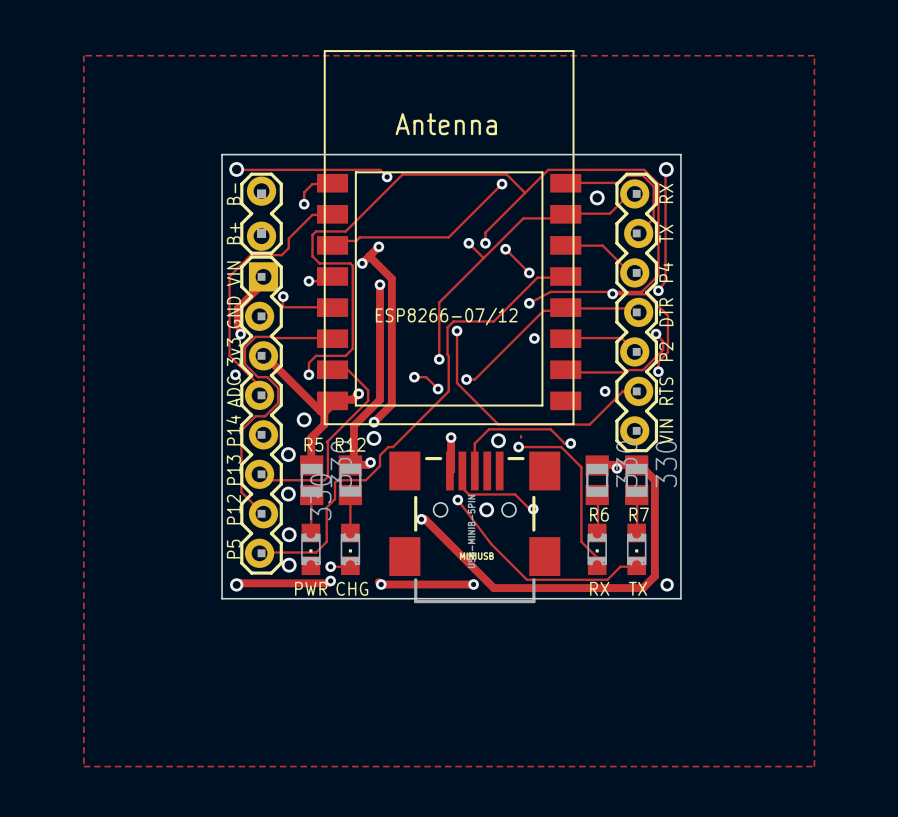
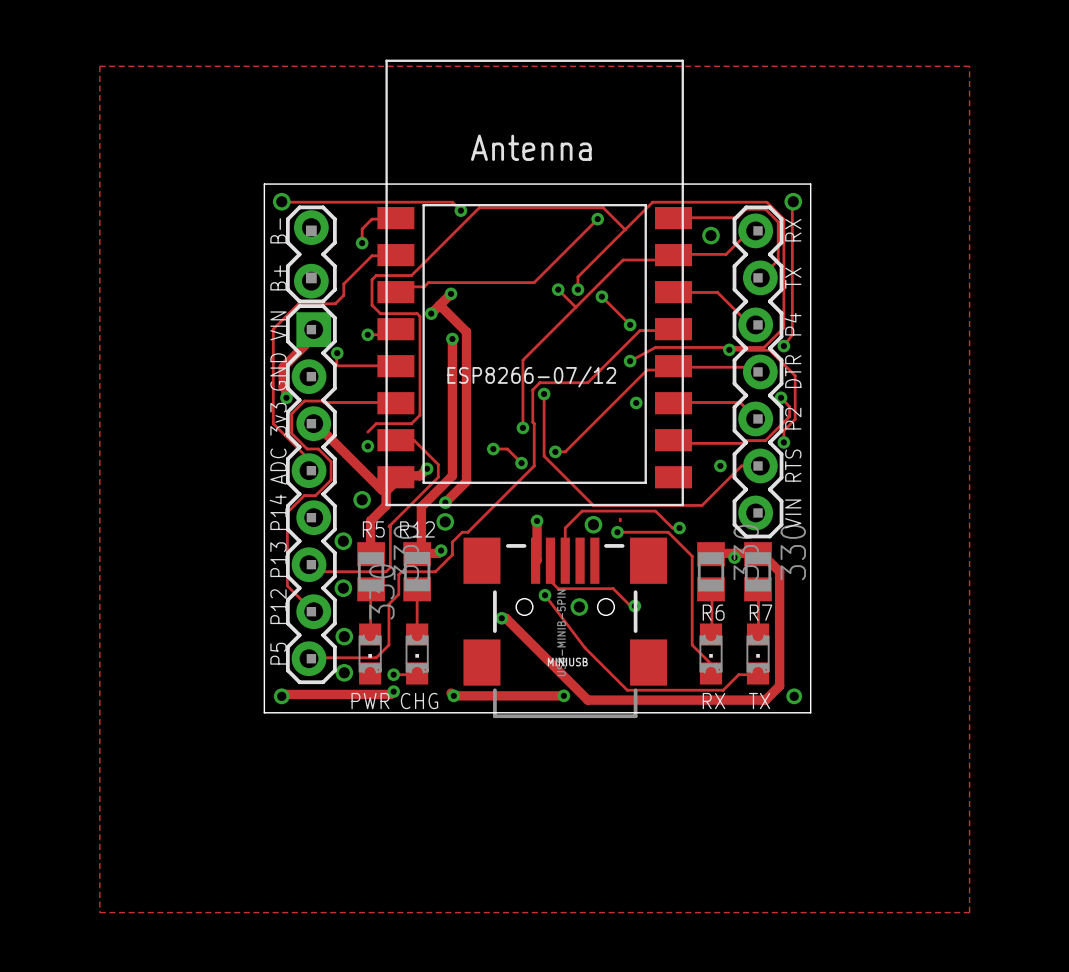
track: (308, 362) (308, 374) -> none
via: (235, 374) -> none

